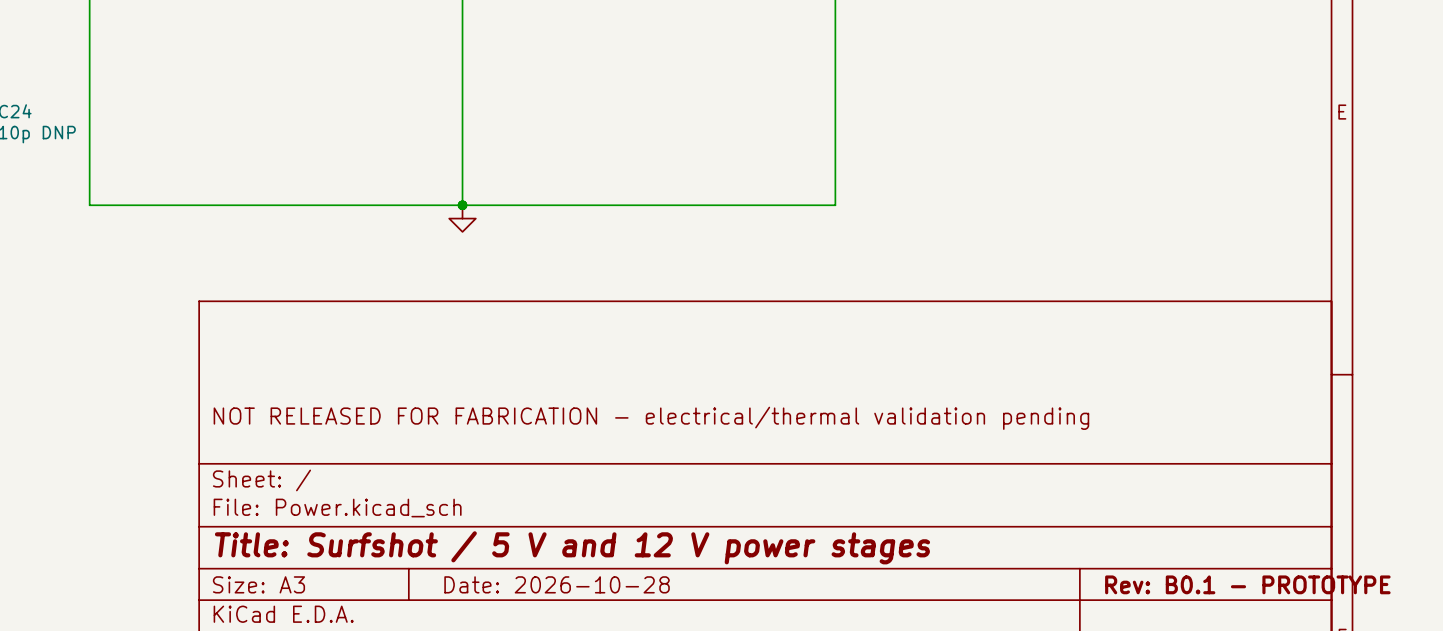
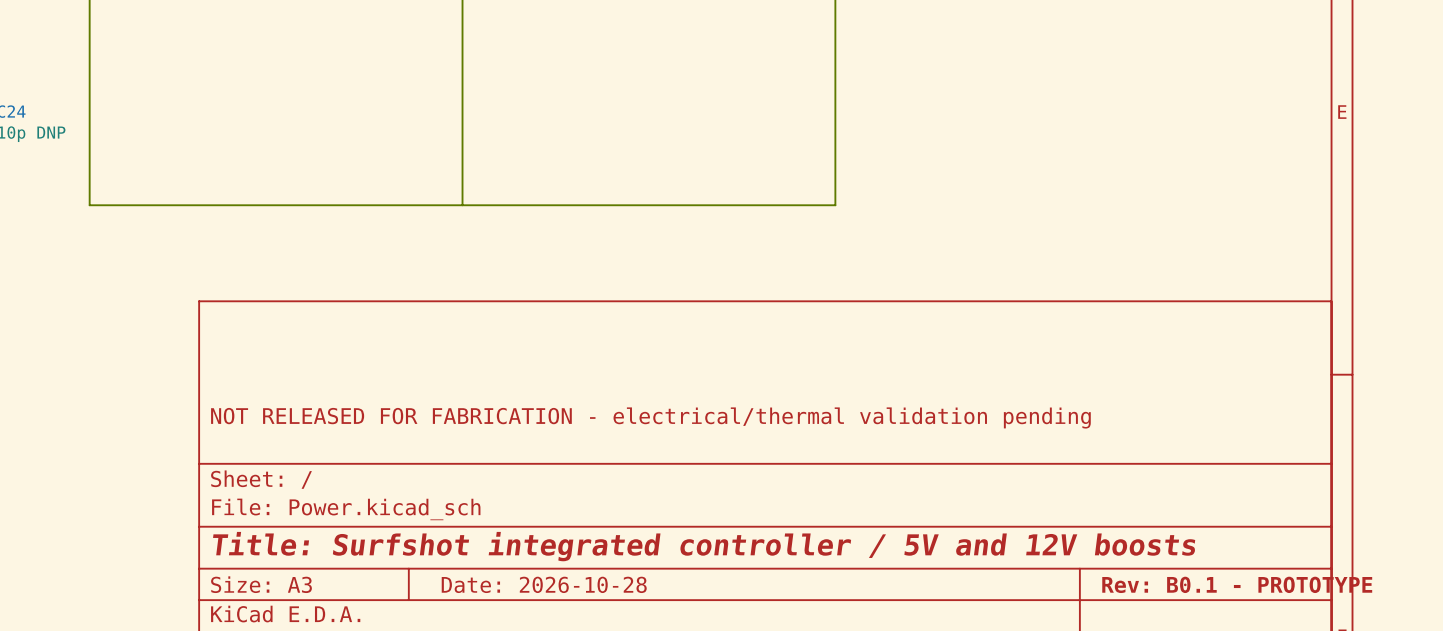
junction: (462, 205) -> none
power symbol: (462, 218) -> none
title block: Title: Surfshot / 5 V and 12 V power stages (572, 547) -> Title: Surfshot integrated controller / 5V and 12V boosts (704, 546)

